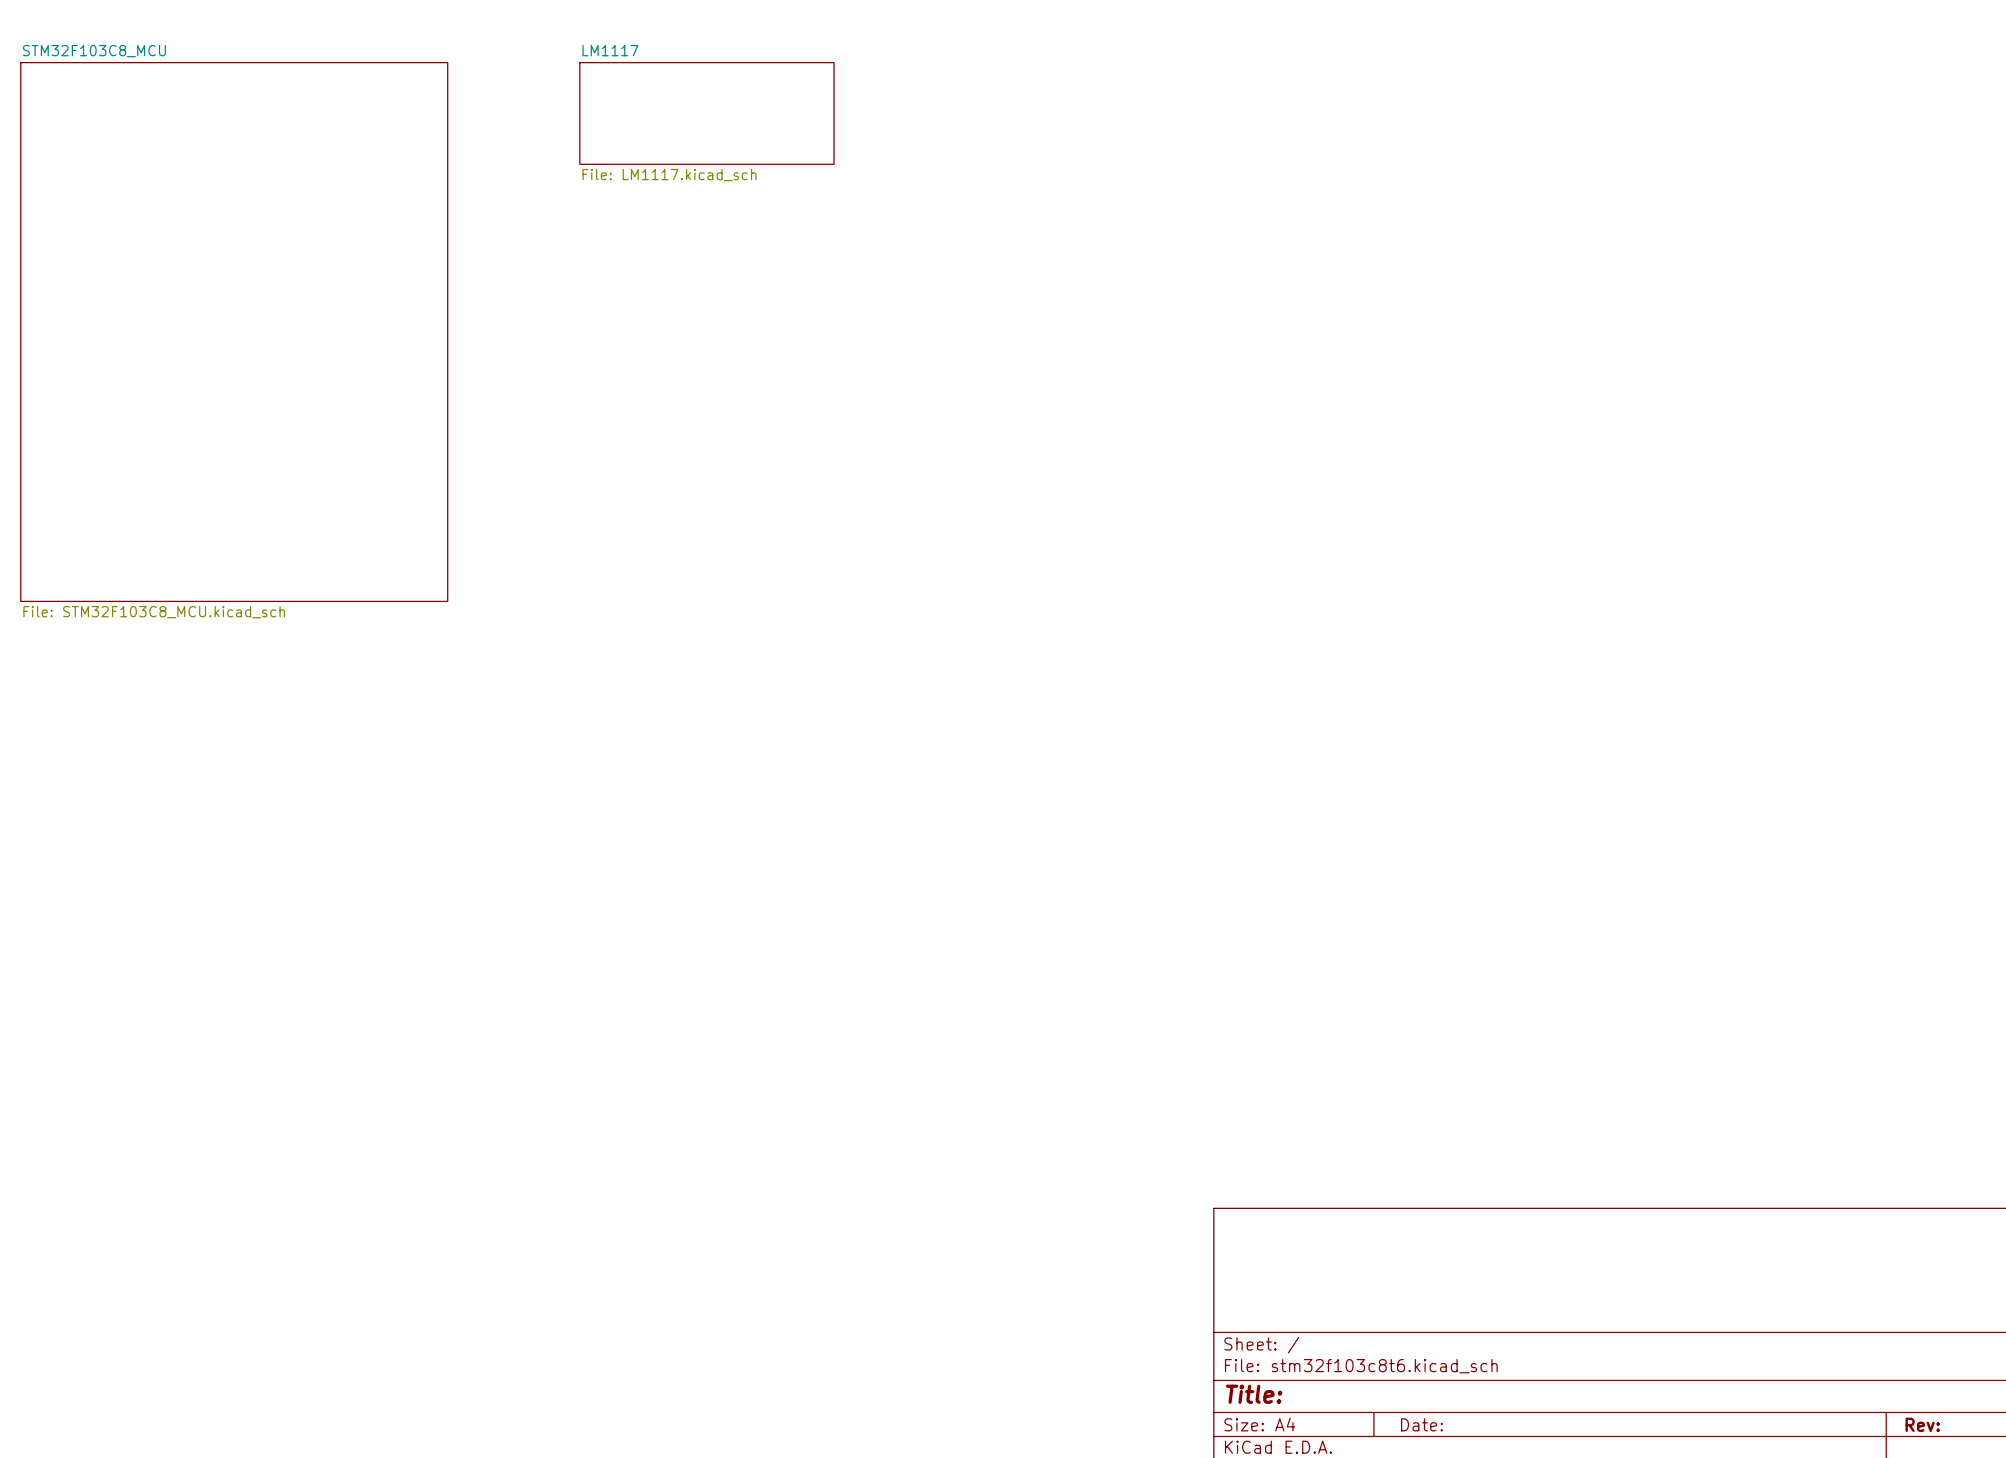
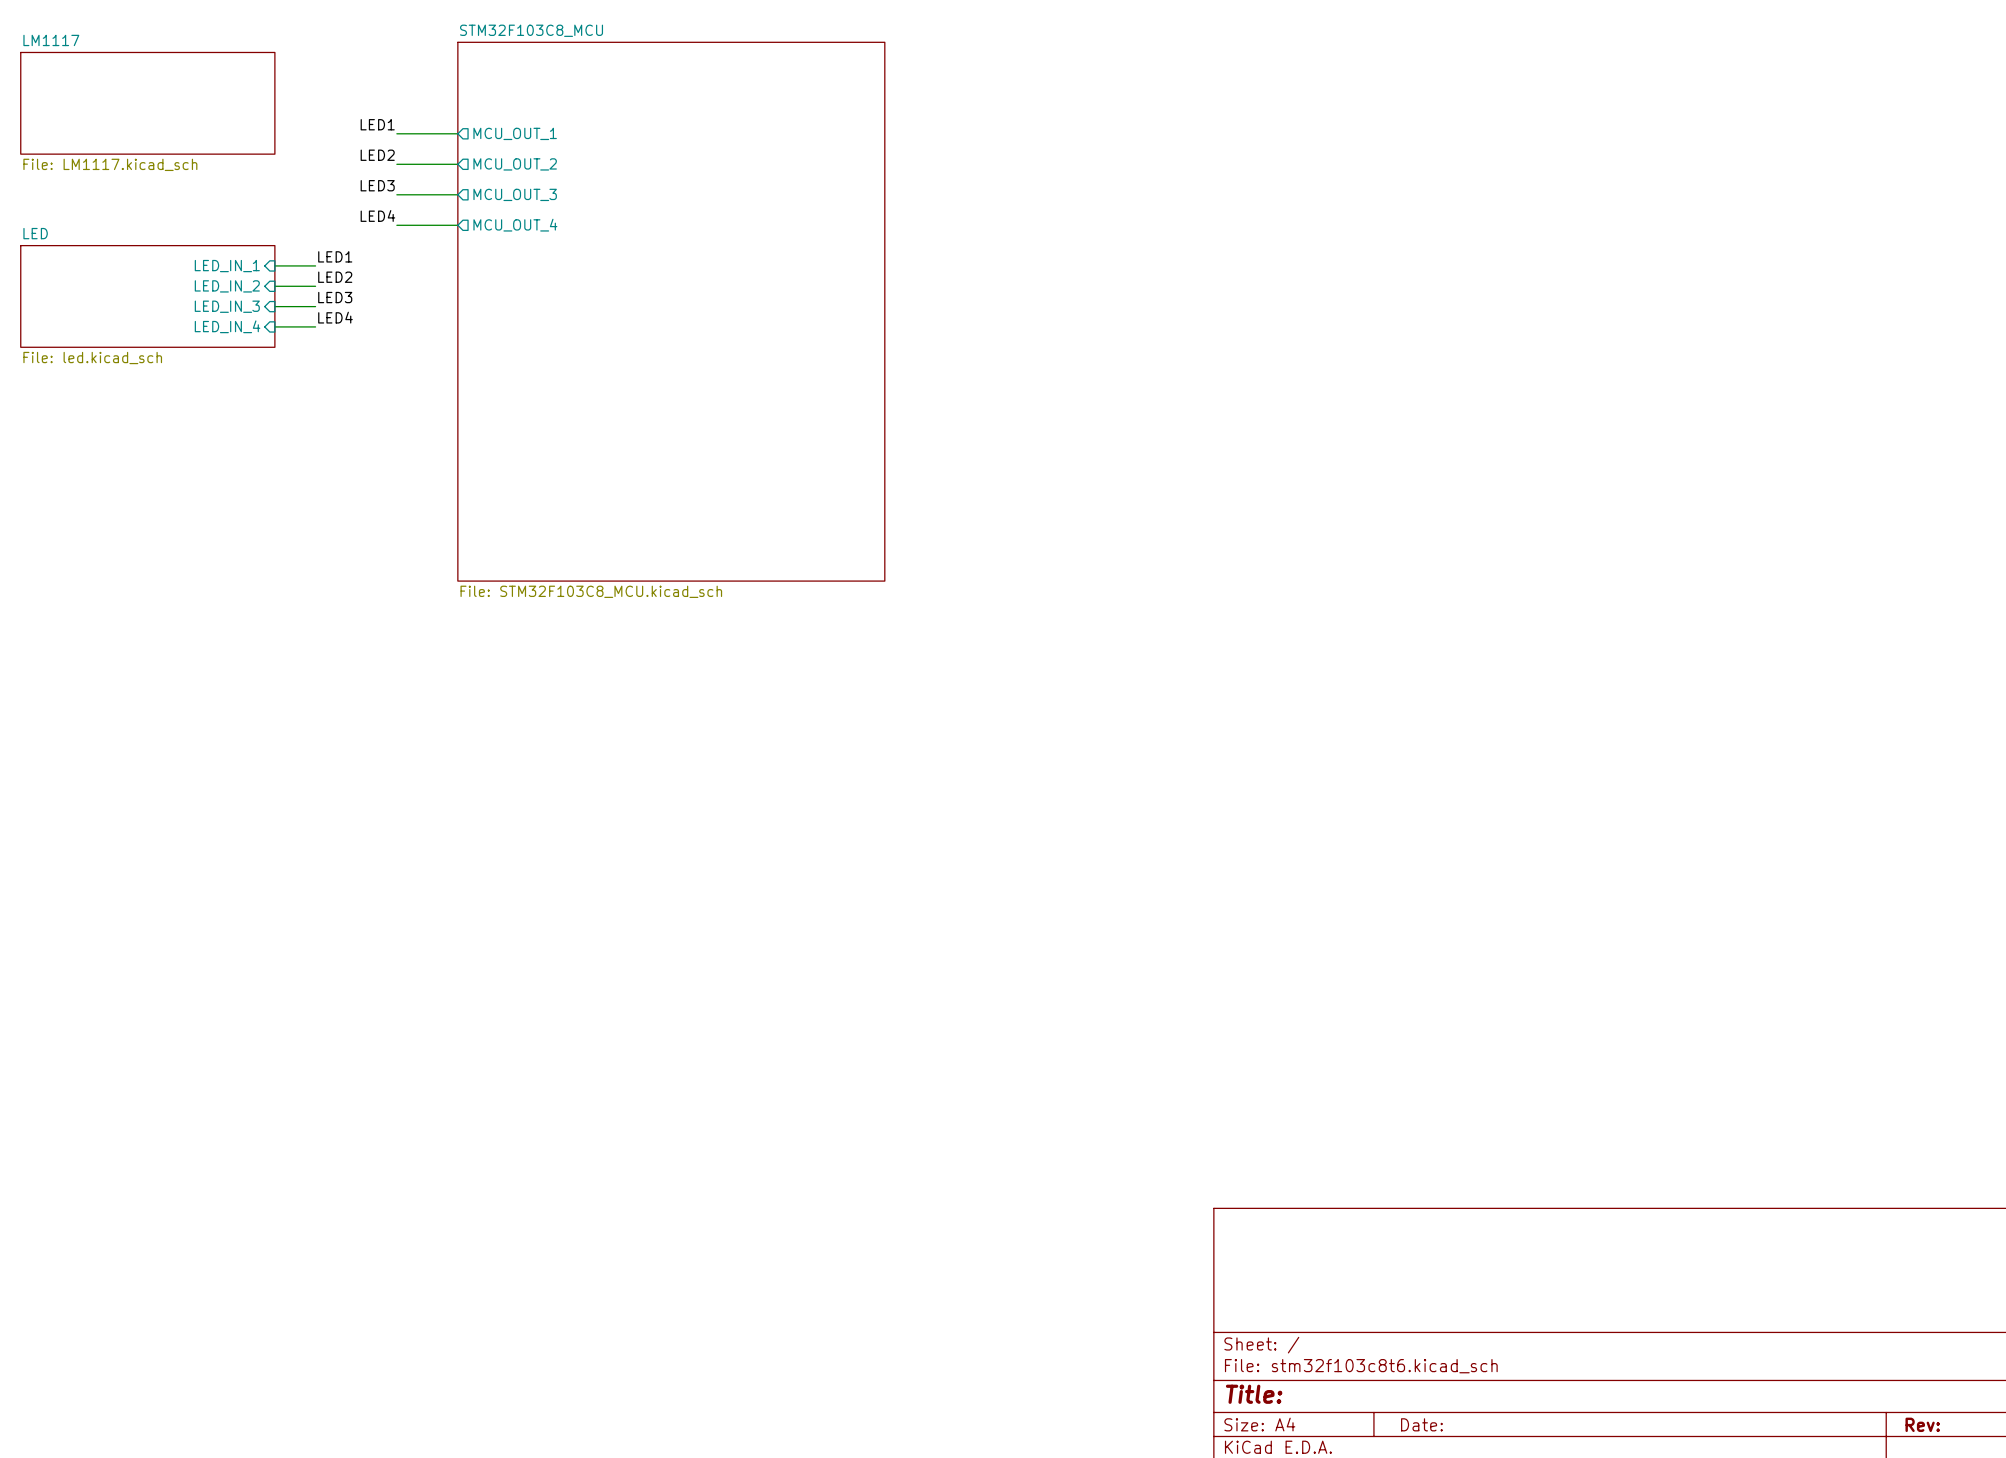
sheet LM1117 position: (706, 113) -> (147, 103)
label: none -> LED1 (377, 124)
wire: none -> (396, 133) (457, 133)
sheet pin: none -> MCU_OUT_1 (515, 133)
label: none -> LED2 (377, 155)
wire: none -> (396, 164) (457, 164)
sheet pin: none -> MCU_OUT_2 (515, 164)
label: none -> LED3 (377, 185)
wire: none -> (396, 194) (457, 194)
sheet pin: none -> MCU_OUT_3 (515, 194)
label: none -> LED4 (377, 215)
wire: none -> (396, 225) (457, 225)
sheet pin: none -> MCU_OUT_4 (515, 225)
label: none -> LED1 (335, 256)
wire: none -> (274, 265) (315, 265)
sheet pin: none -> LED_IN_1 (227, 266)
label: none -> LED2 (335, 277)
sheet pin: none -> LED_IN_2 (227, 286)
wire: none -> (274, 286) (315, 286)
sheet LED: none -> File: led.kicad_sch (147, 296)
label: none -> LED3 (335, 297)
sheet pin: none -> LED_IN_3 (227, 306)
wire: none -> (274, 306) (315, 306)
label: none -> LED4 (335, 317)
sheet pin: none -> LED_IN_4 (227, 326)
wire: none -> (274, 326) (315, 326)
sheet STM32F103C8_MCU position: (234, 332) -> (671, 311)

